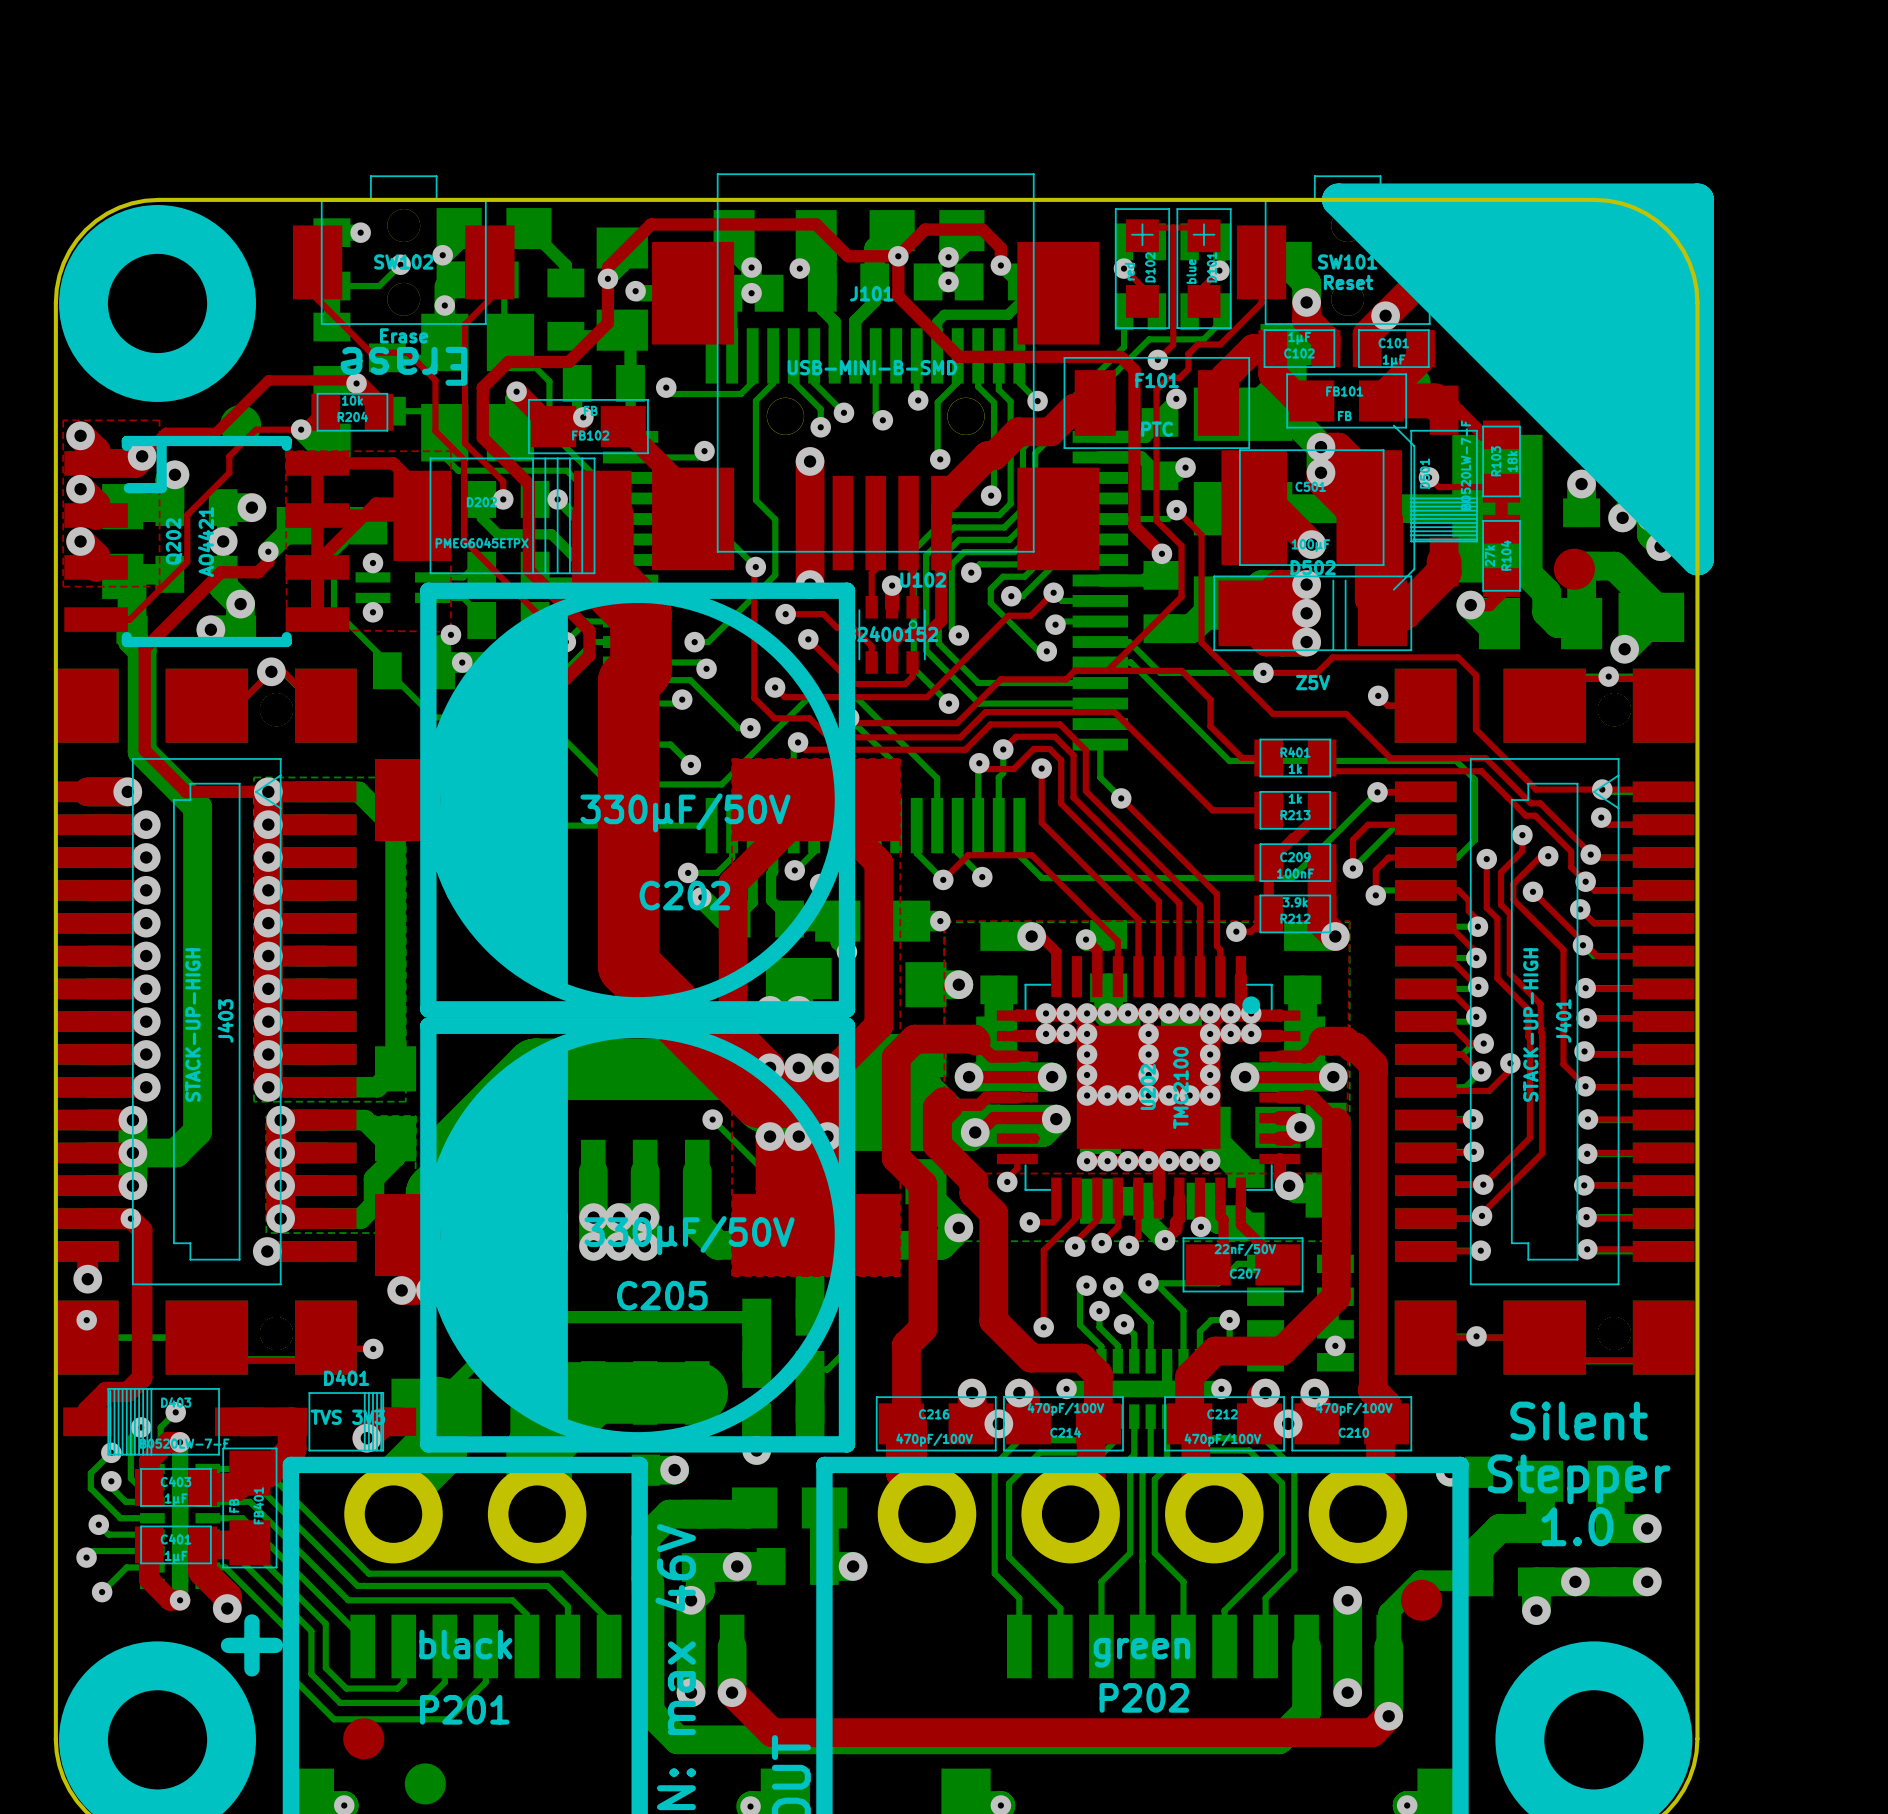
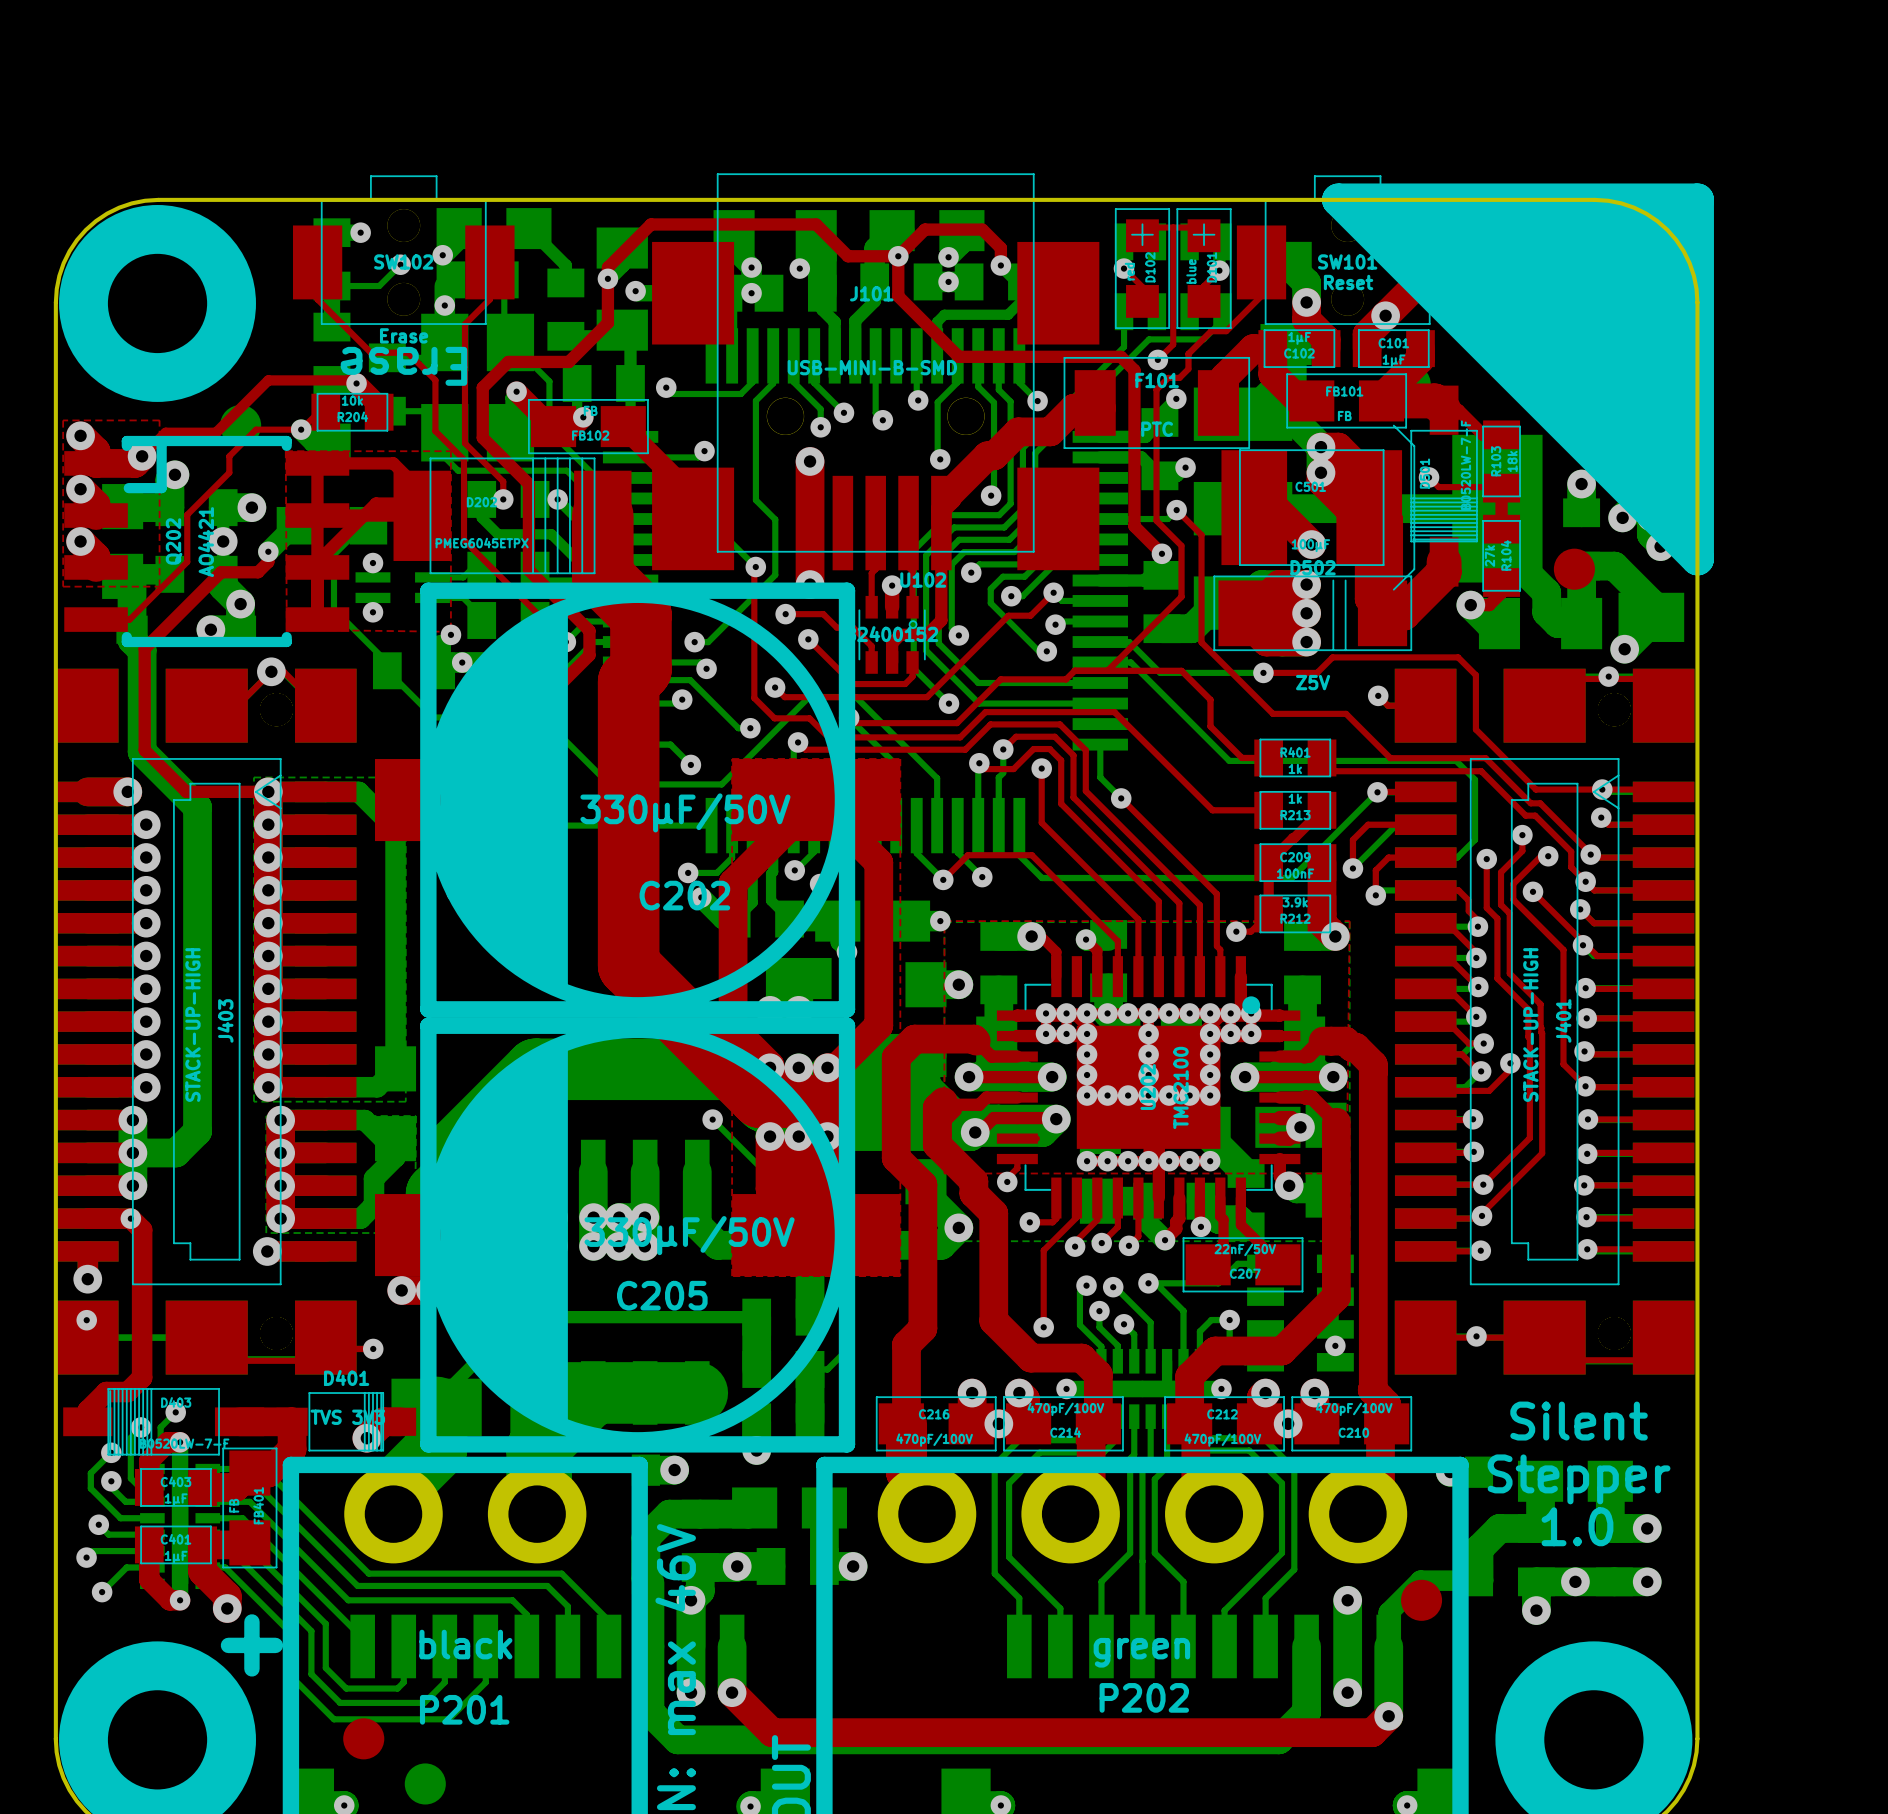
top track: (1261, 295) (1261, 303) (1220, 344) (1197, 344) -> (1261, 295) (1226, 331) (1211, 331) (1197, 344)

